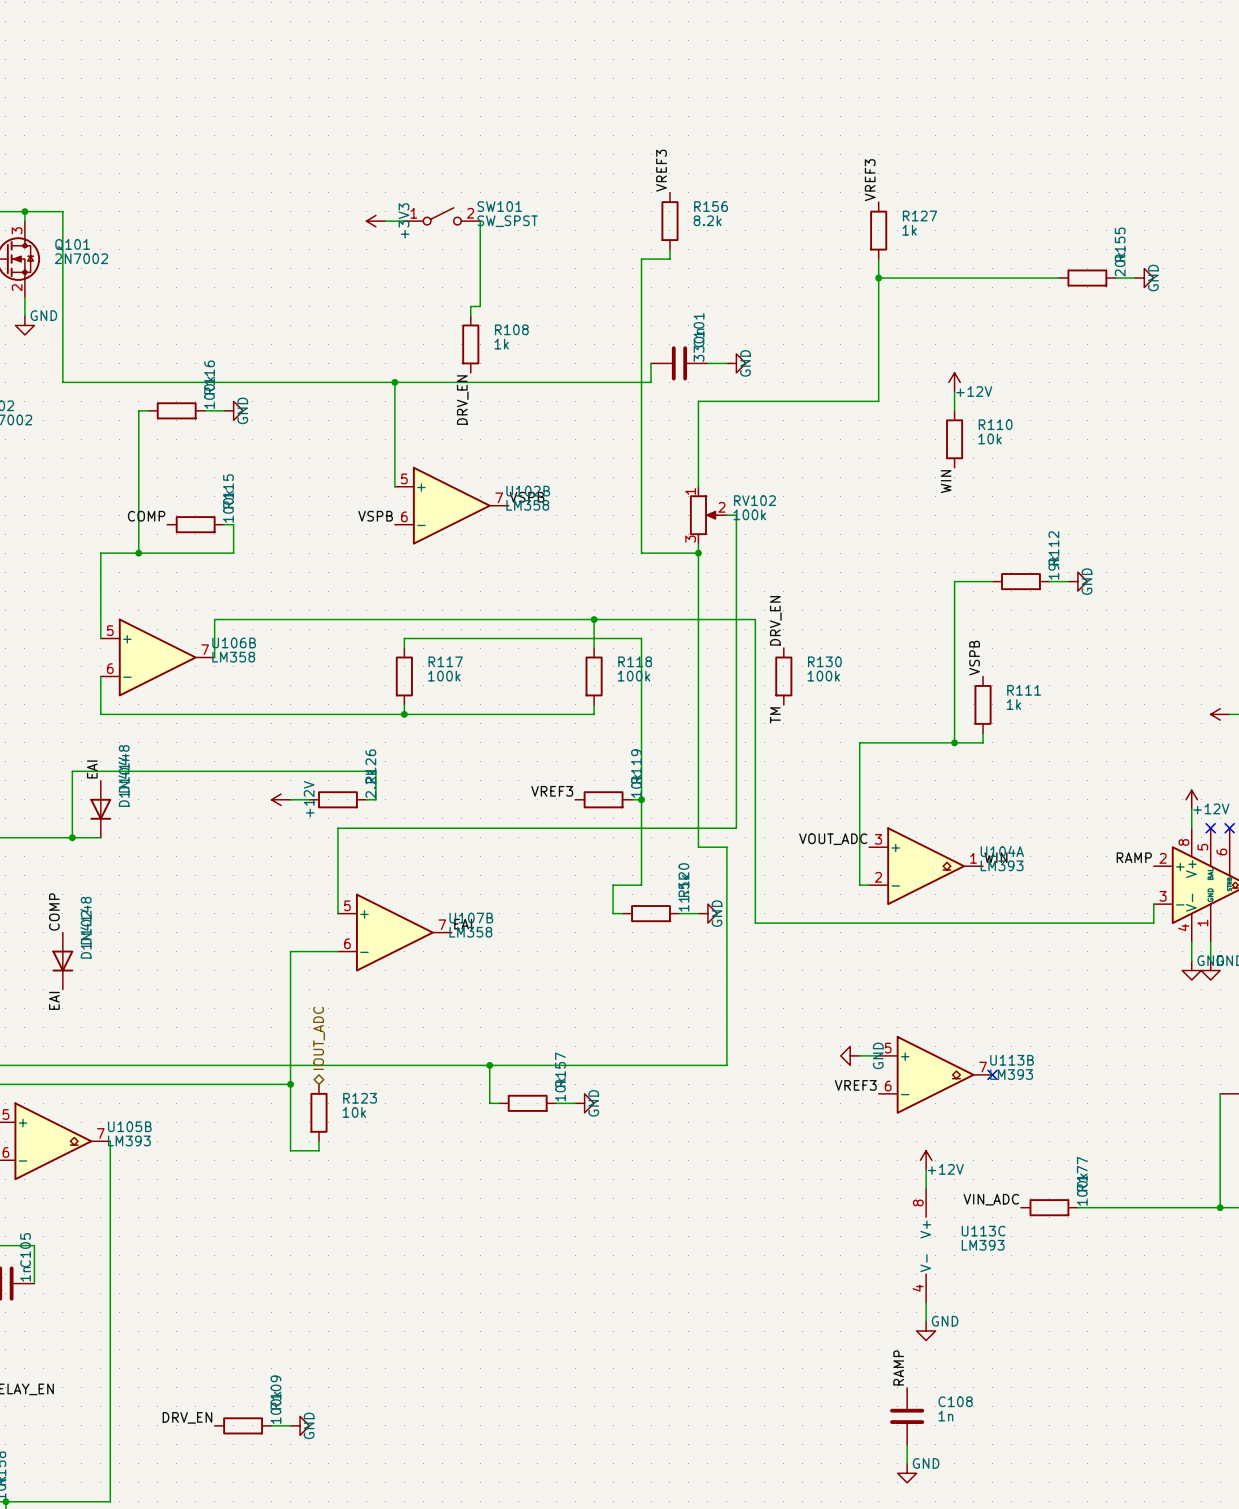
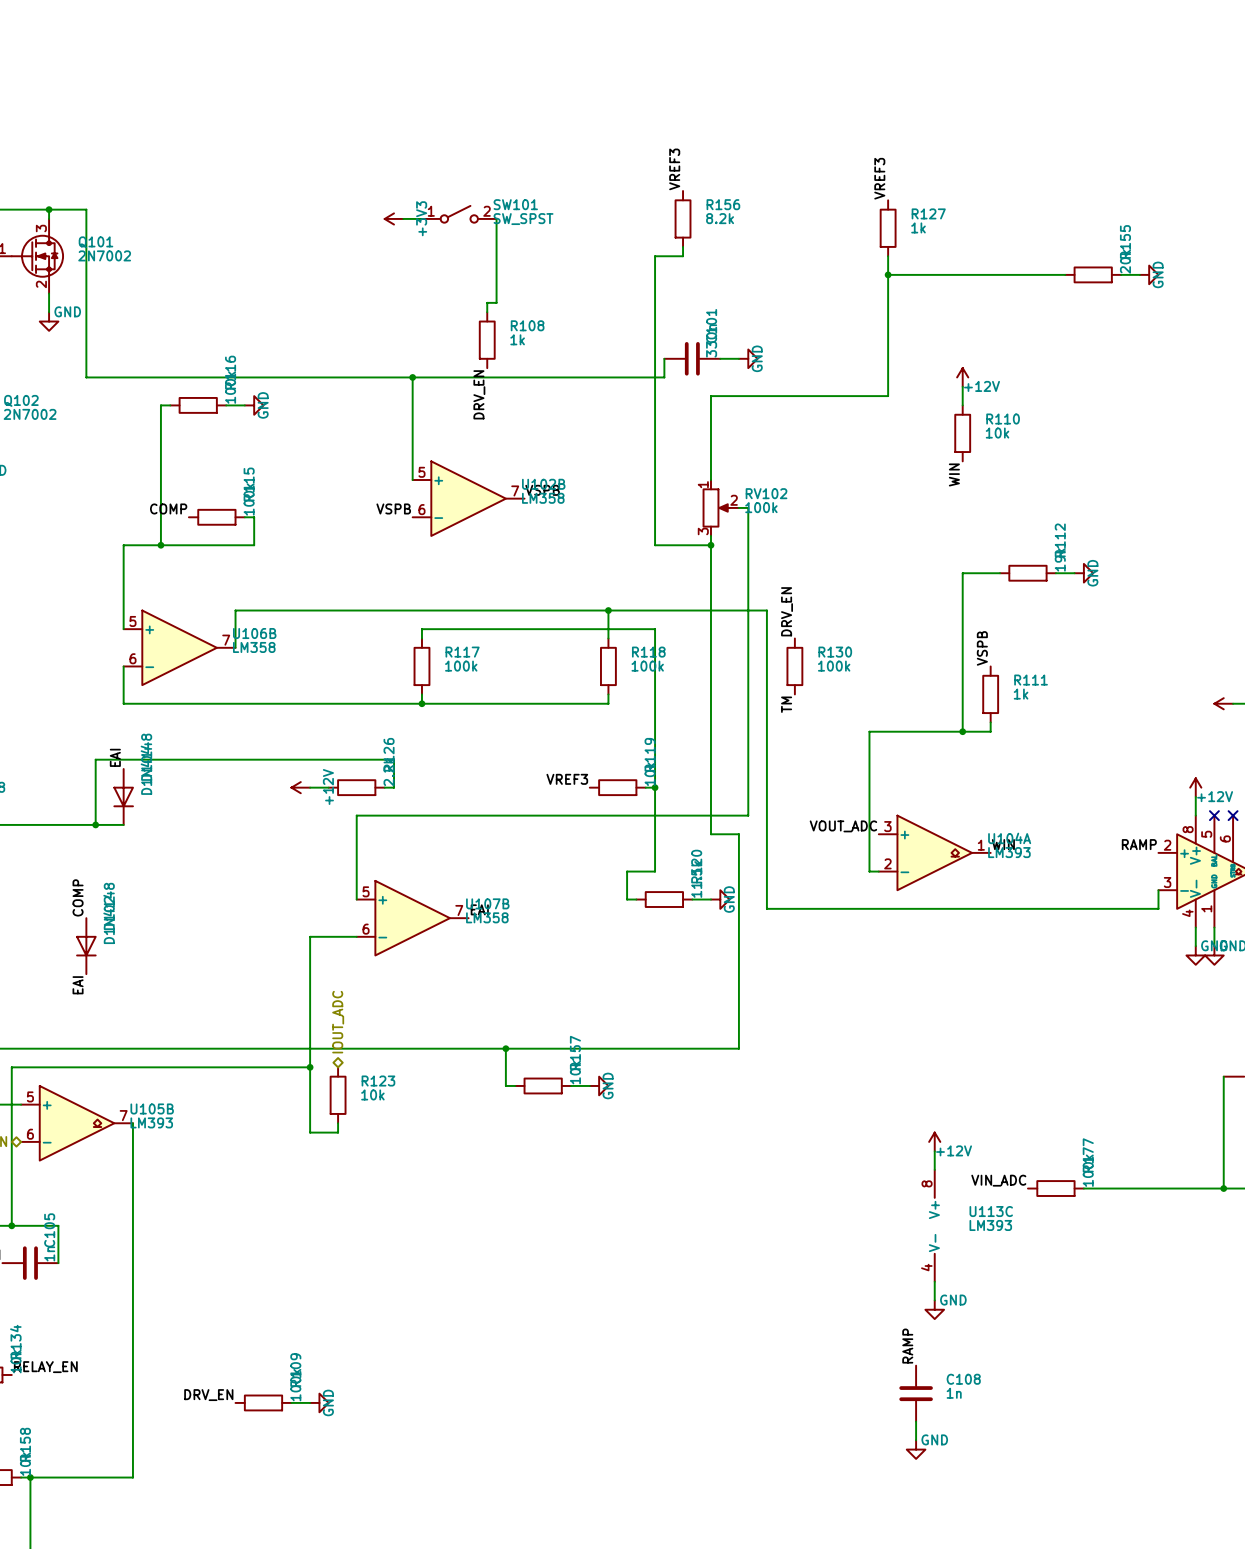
power symbol: GND (850, 1055) -> none
wire: (859, 1055) (878, 1055) -> none
U113B: LM393 (935, 1074) -> none
no-connect mark: (992, 1074) -> none
label: VREF3 (855, 1085) -> none

